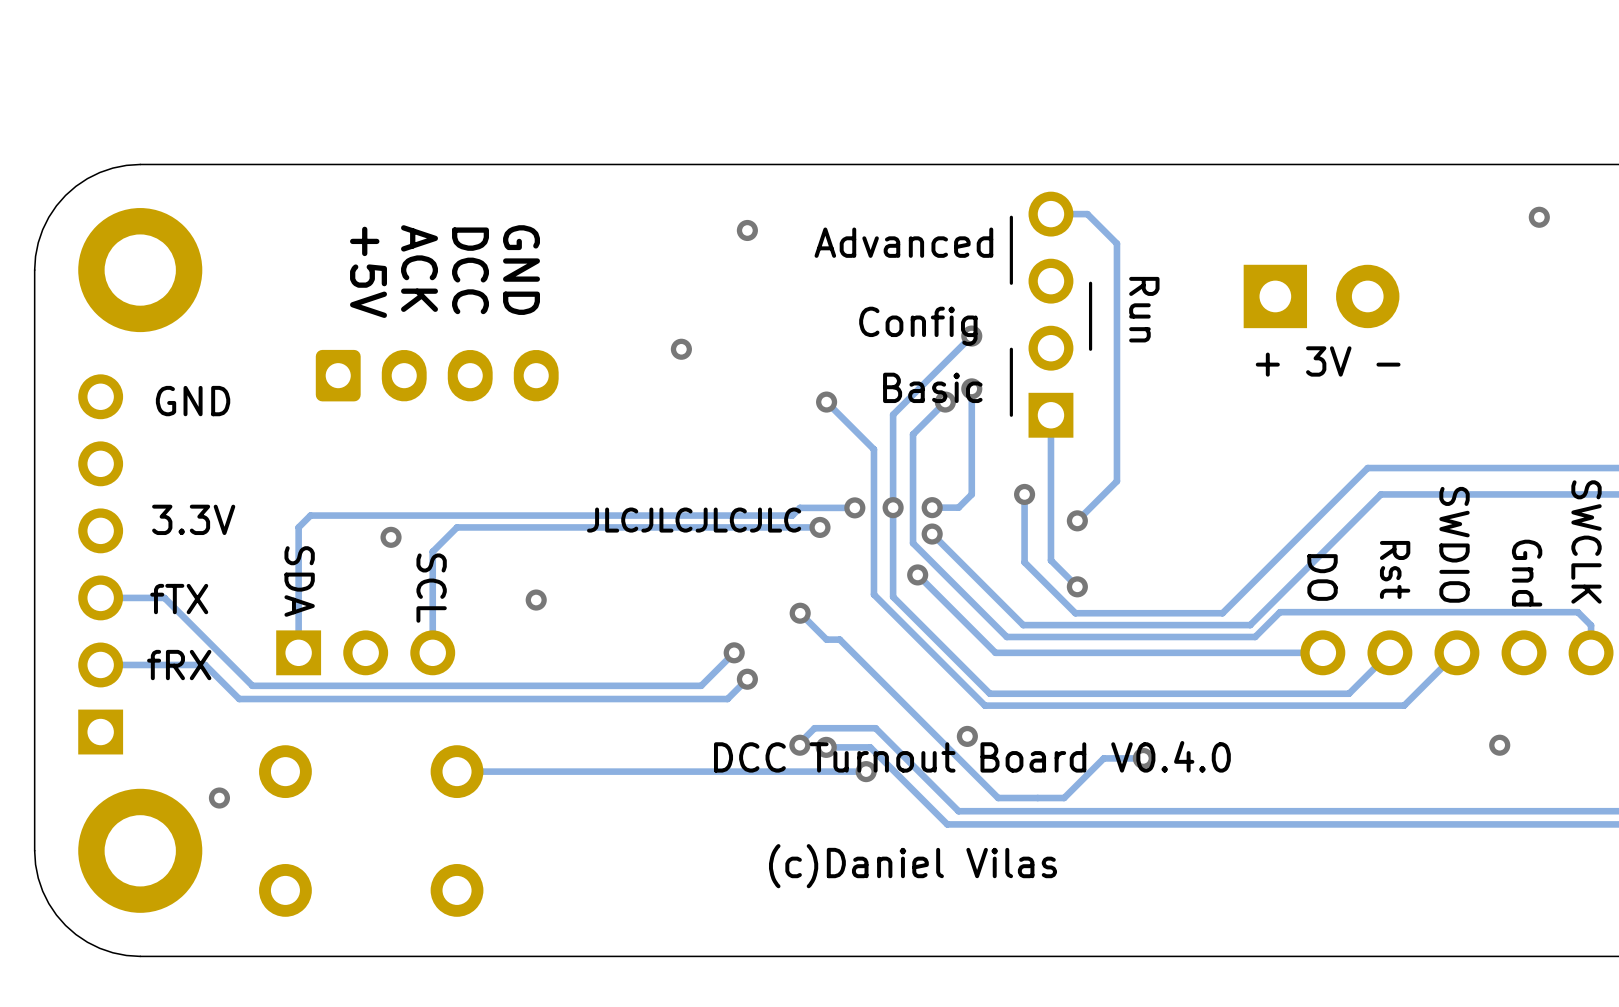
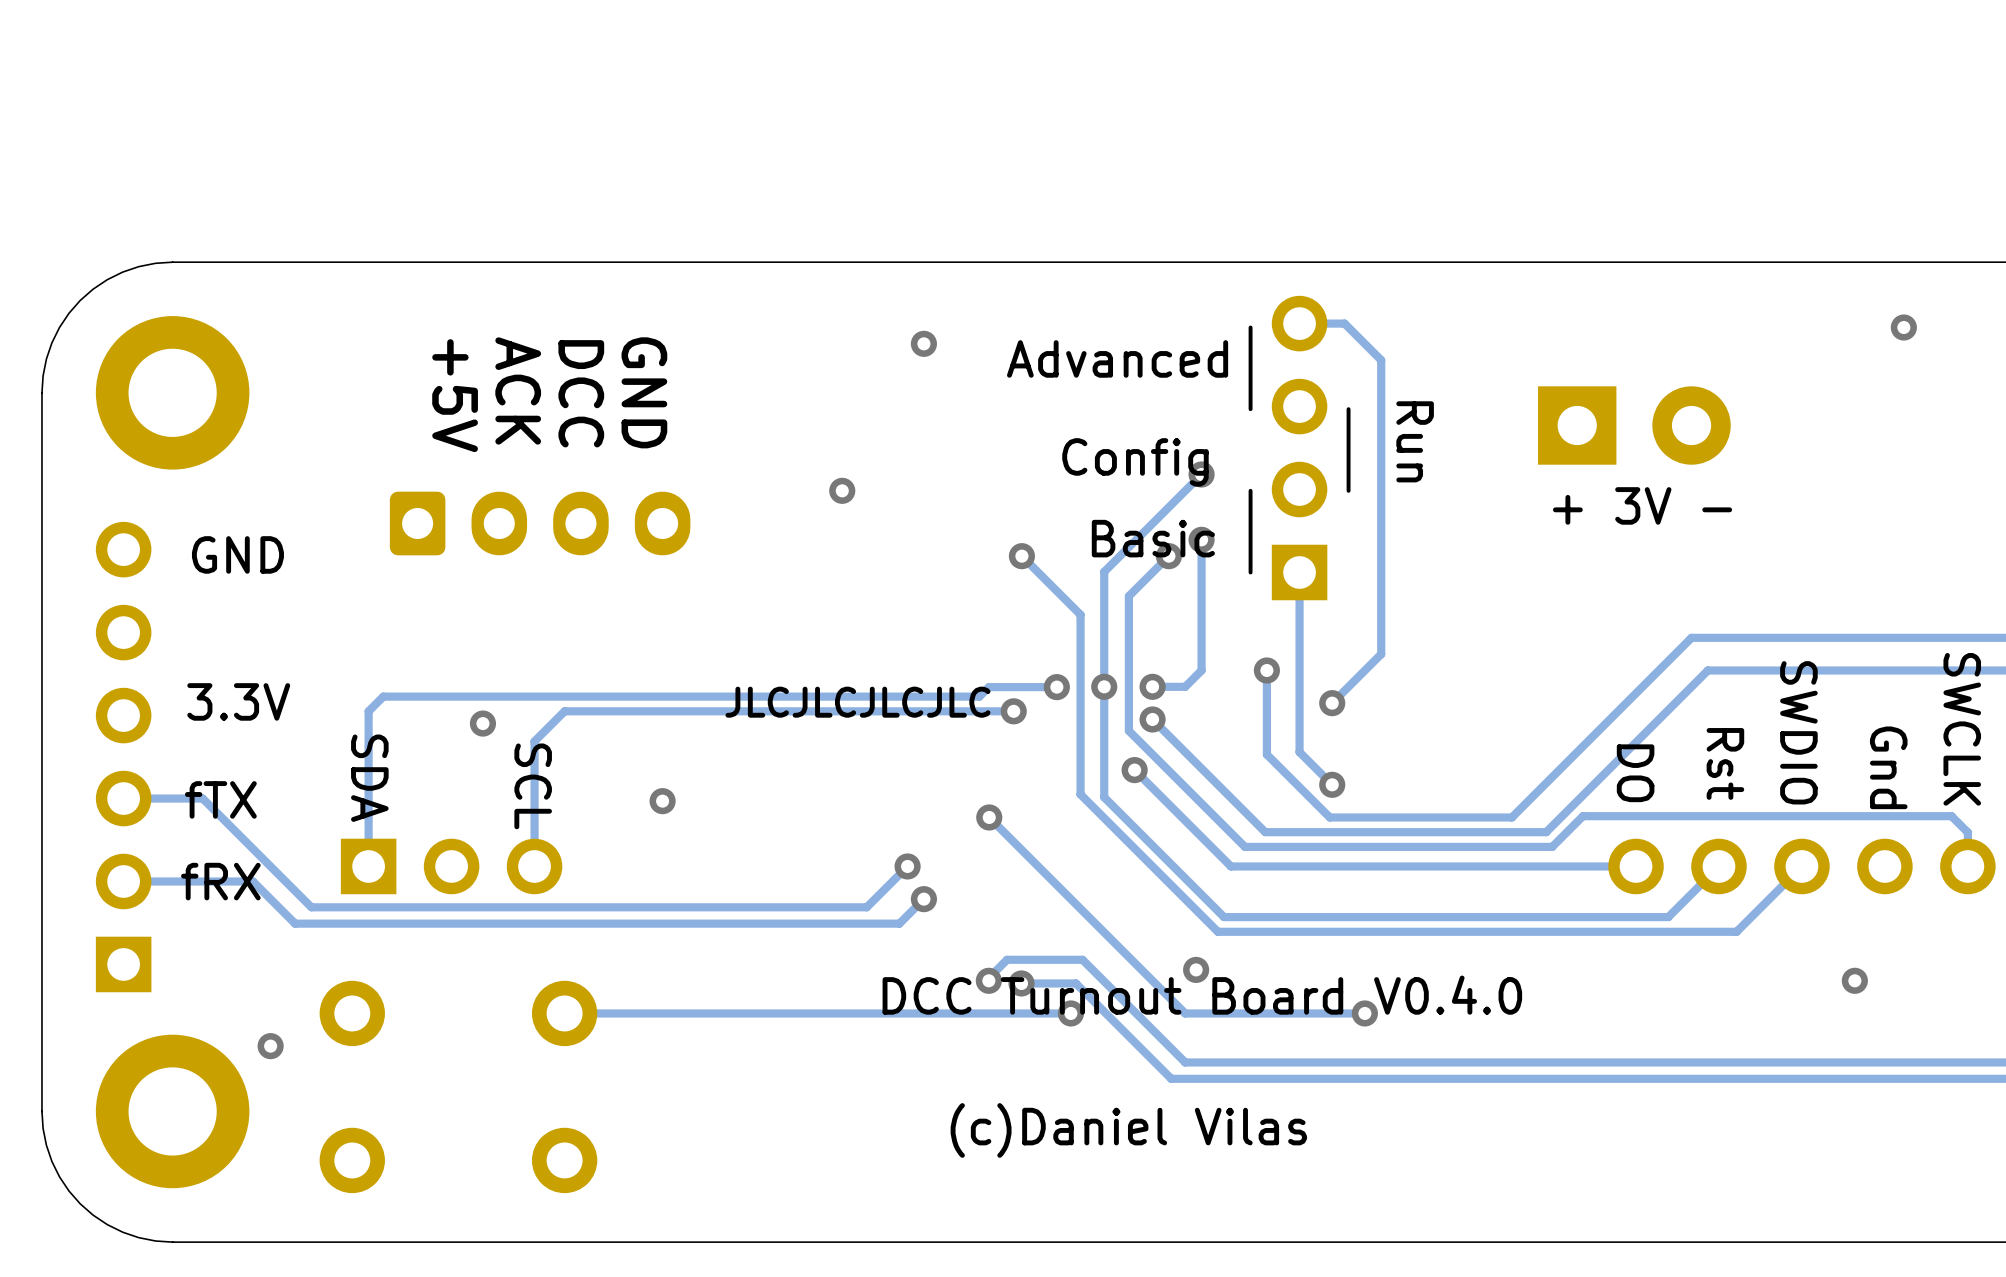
track: (826, 639) (839, 639) (998, 798) (1064, 798) (1103, 758) (1143, 758) -> (1021, 850) (1185, 1013) (1364, 1013)
via position: (1143, 758) -> (1364, 1013)

